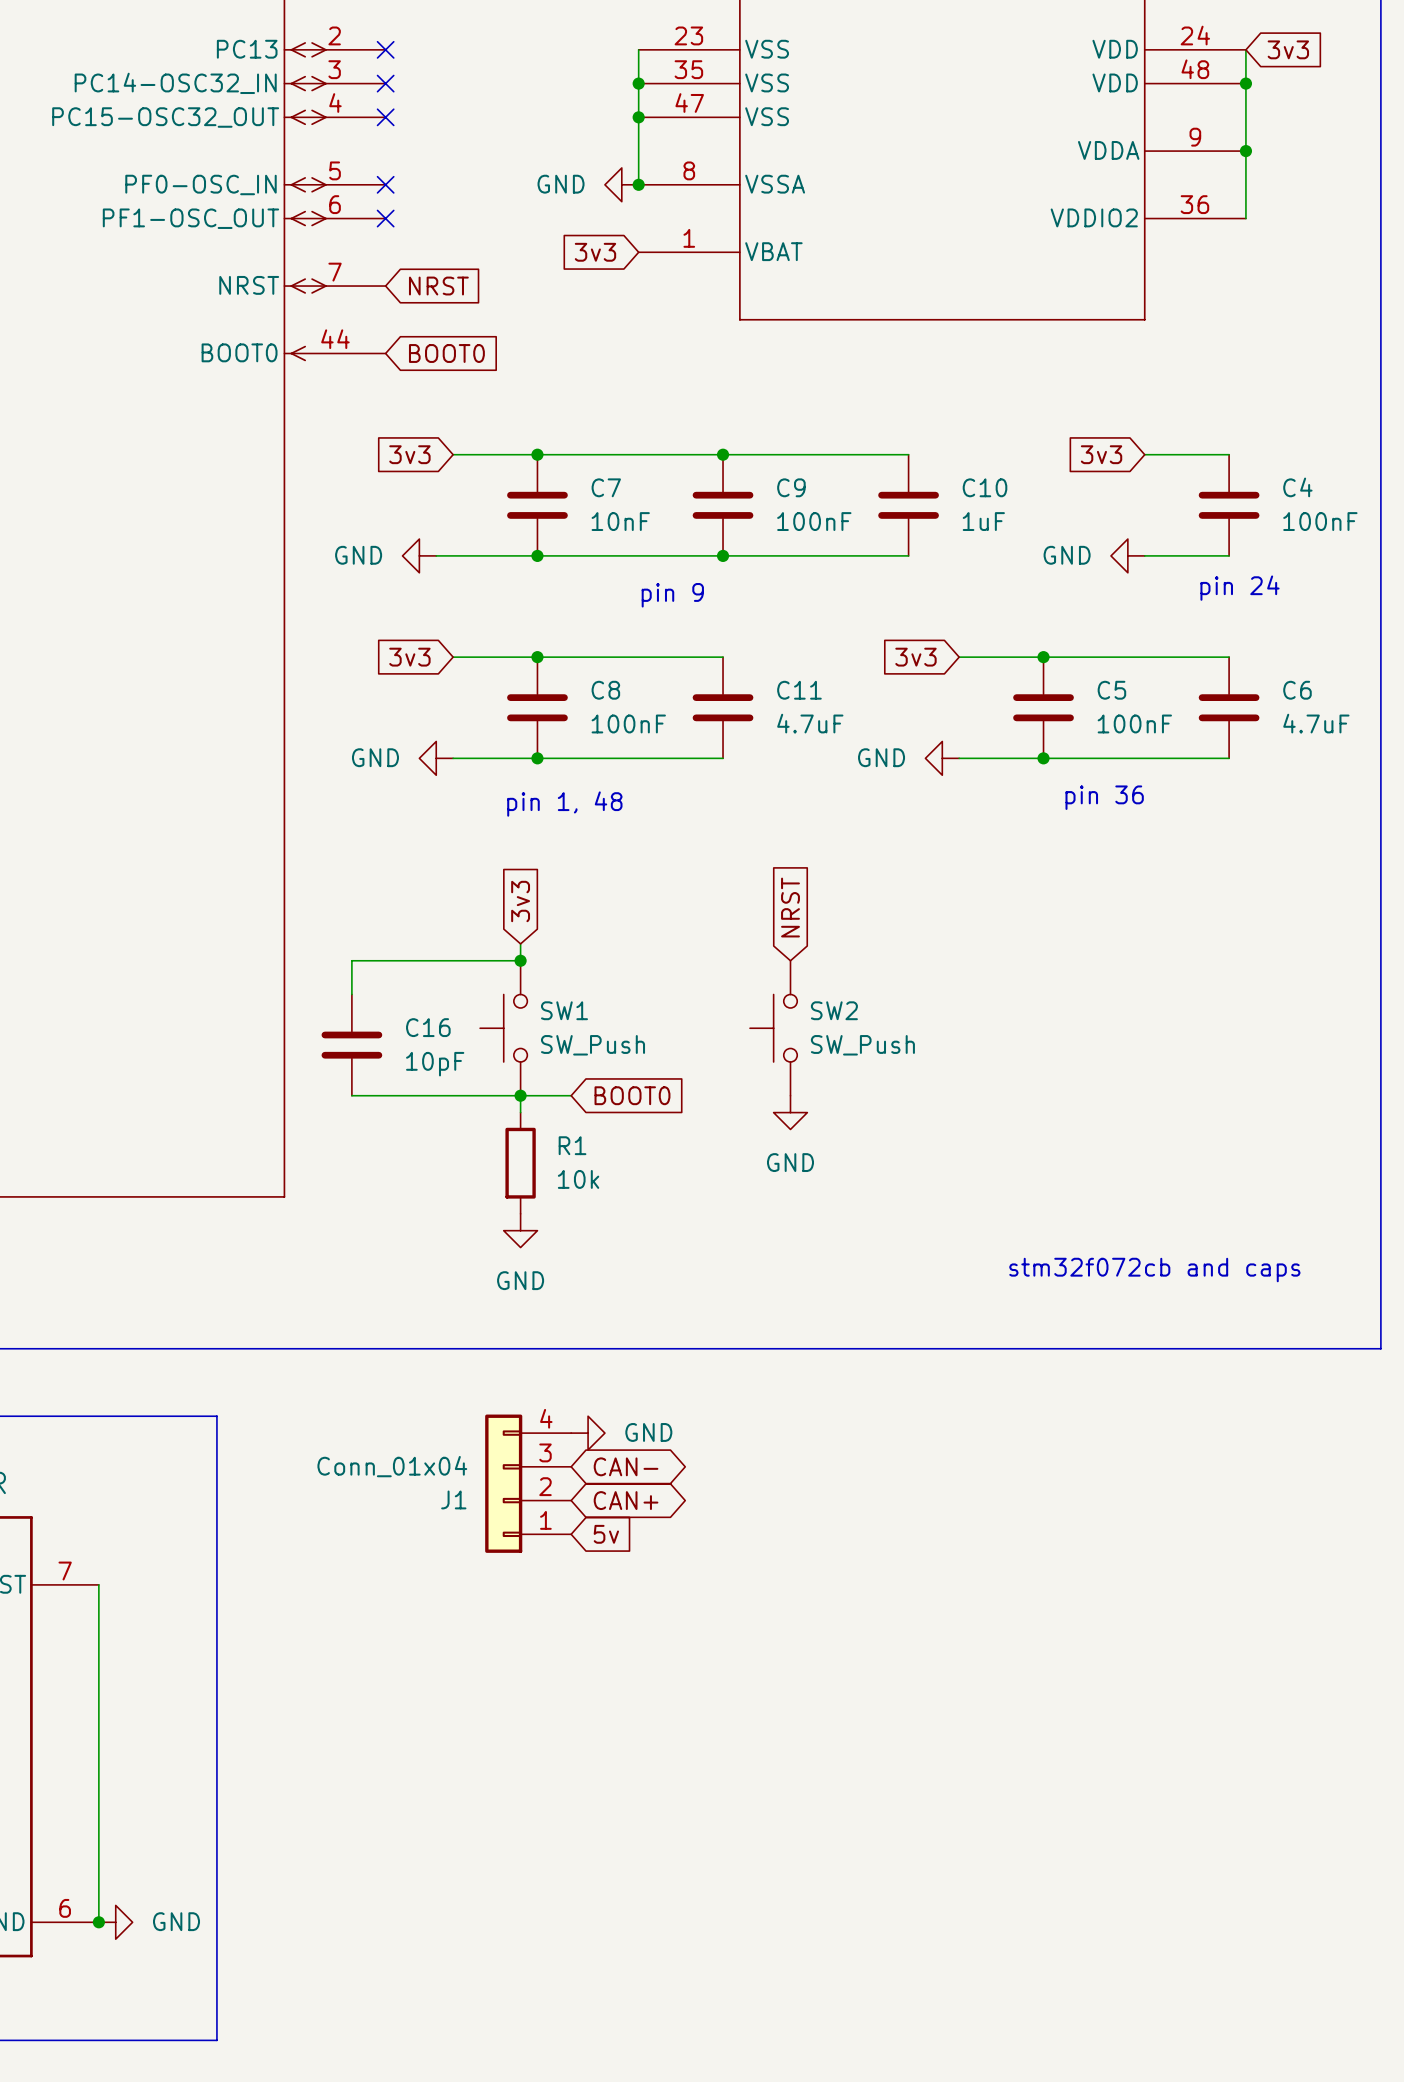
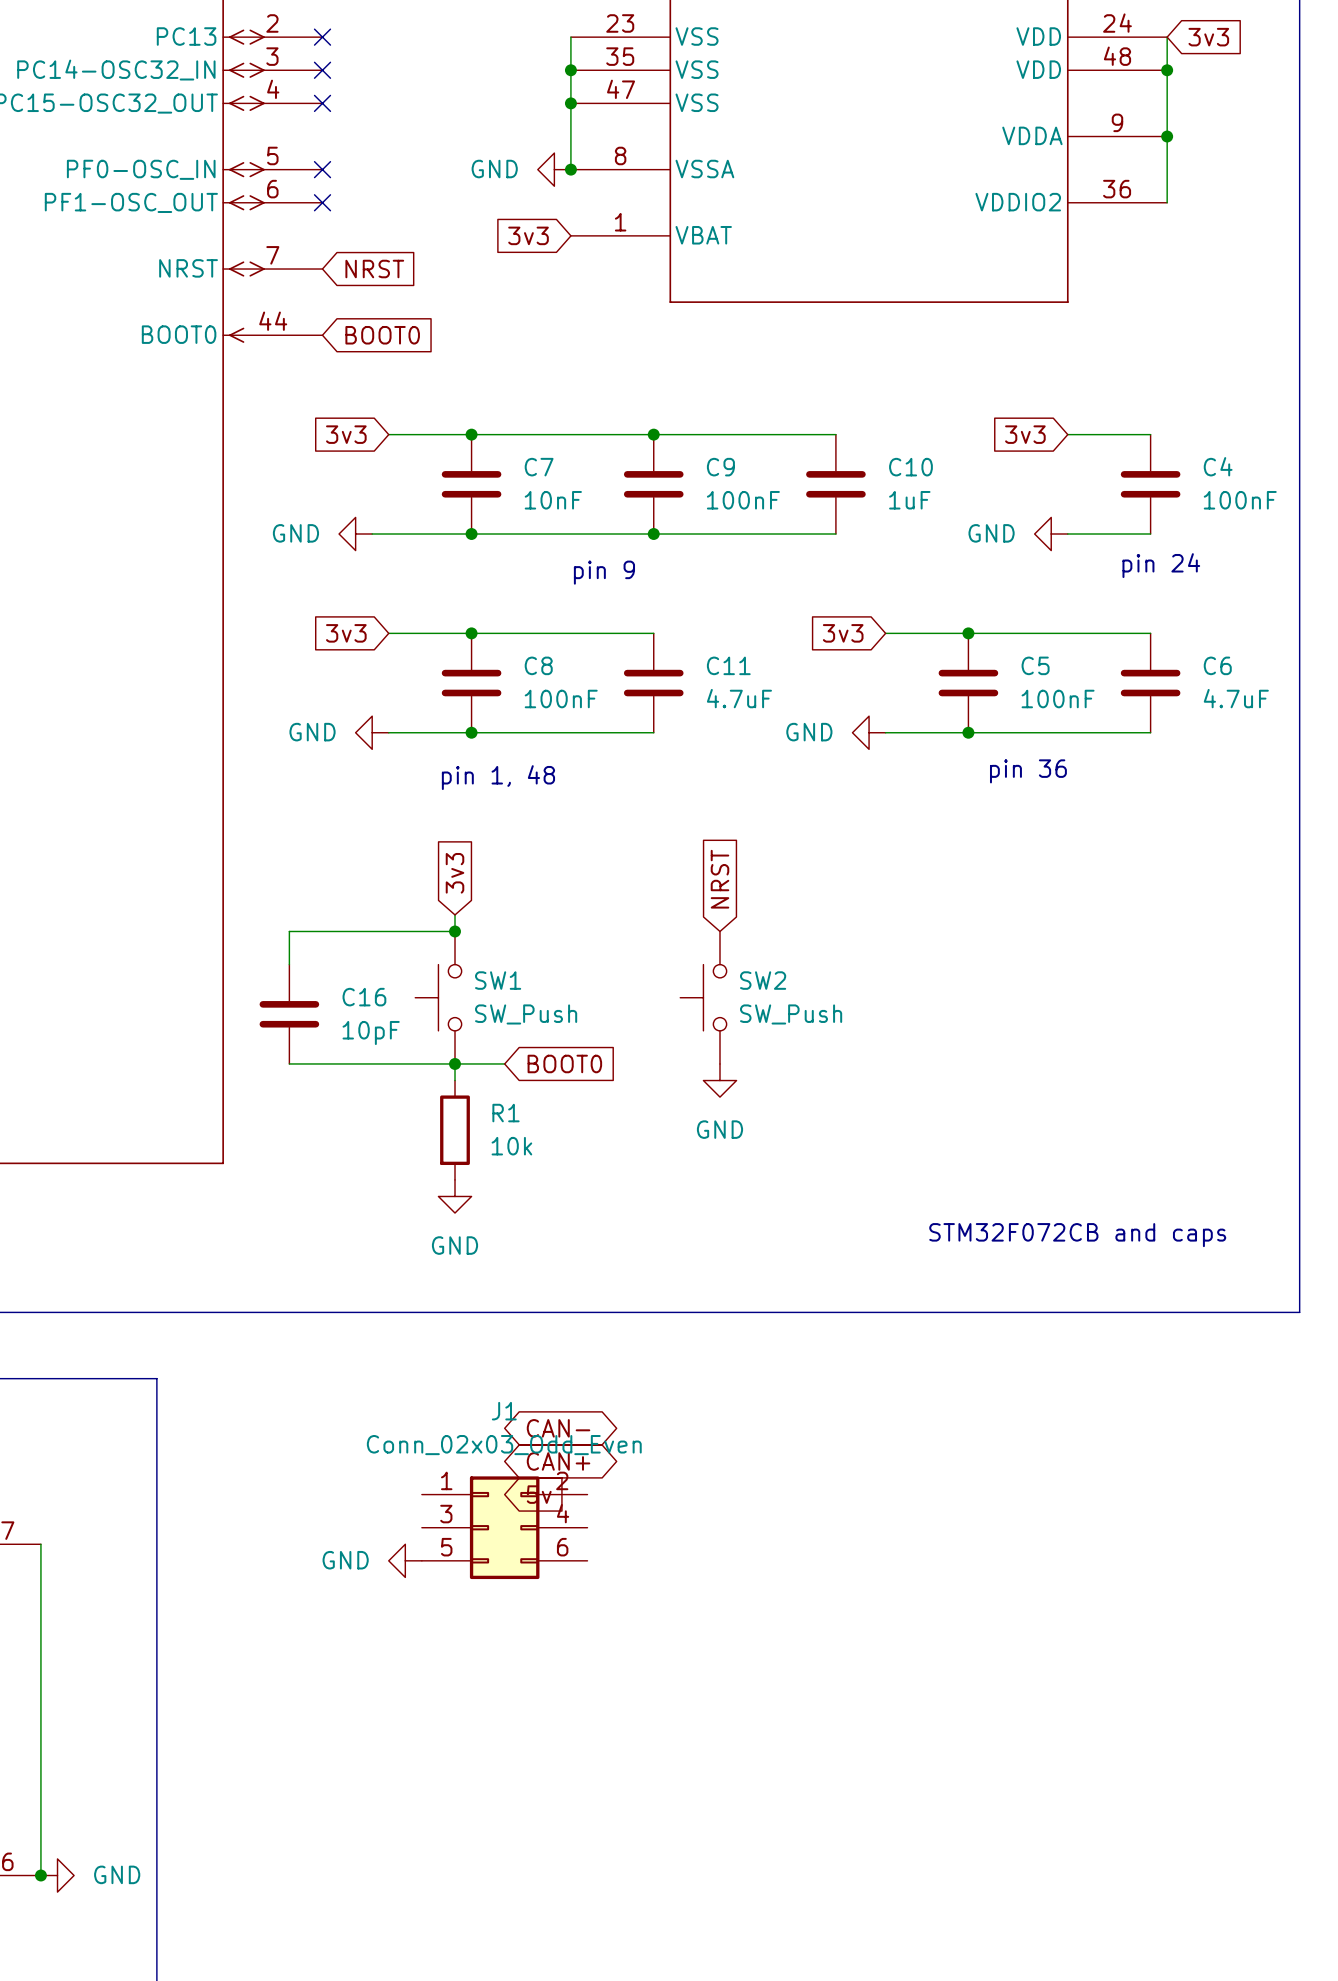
text: stm32f072cb and caps (1154, 1270) -> STM32F072CB and caps (1077, 1235)
J1 symbol: [485, 1414, 572, 1553] -> [421, 1476, 588, 1580]
power symbol rotation: 0° (588, 1433) -> 180° (405, 1560)
power symbol position: GND (588, 1433) -> GND (405, 1560)
J1 value: Conn_01x04 (392, 1466) -> Conn_02x03_Odd_Even (504, 1445)
J1 name position: J1 (453, 1499) -> J1 (504, 1411)

